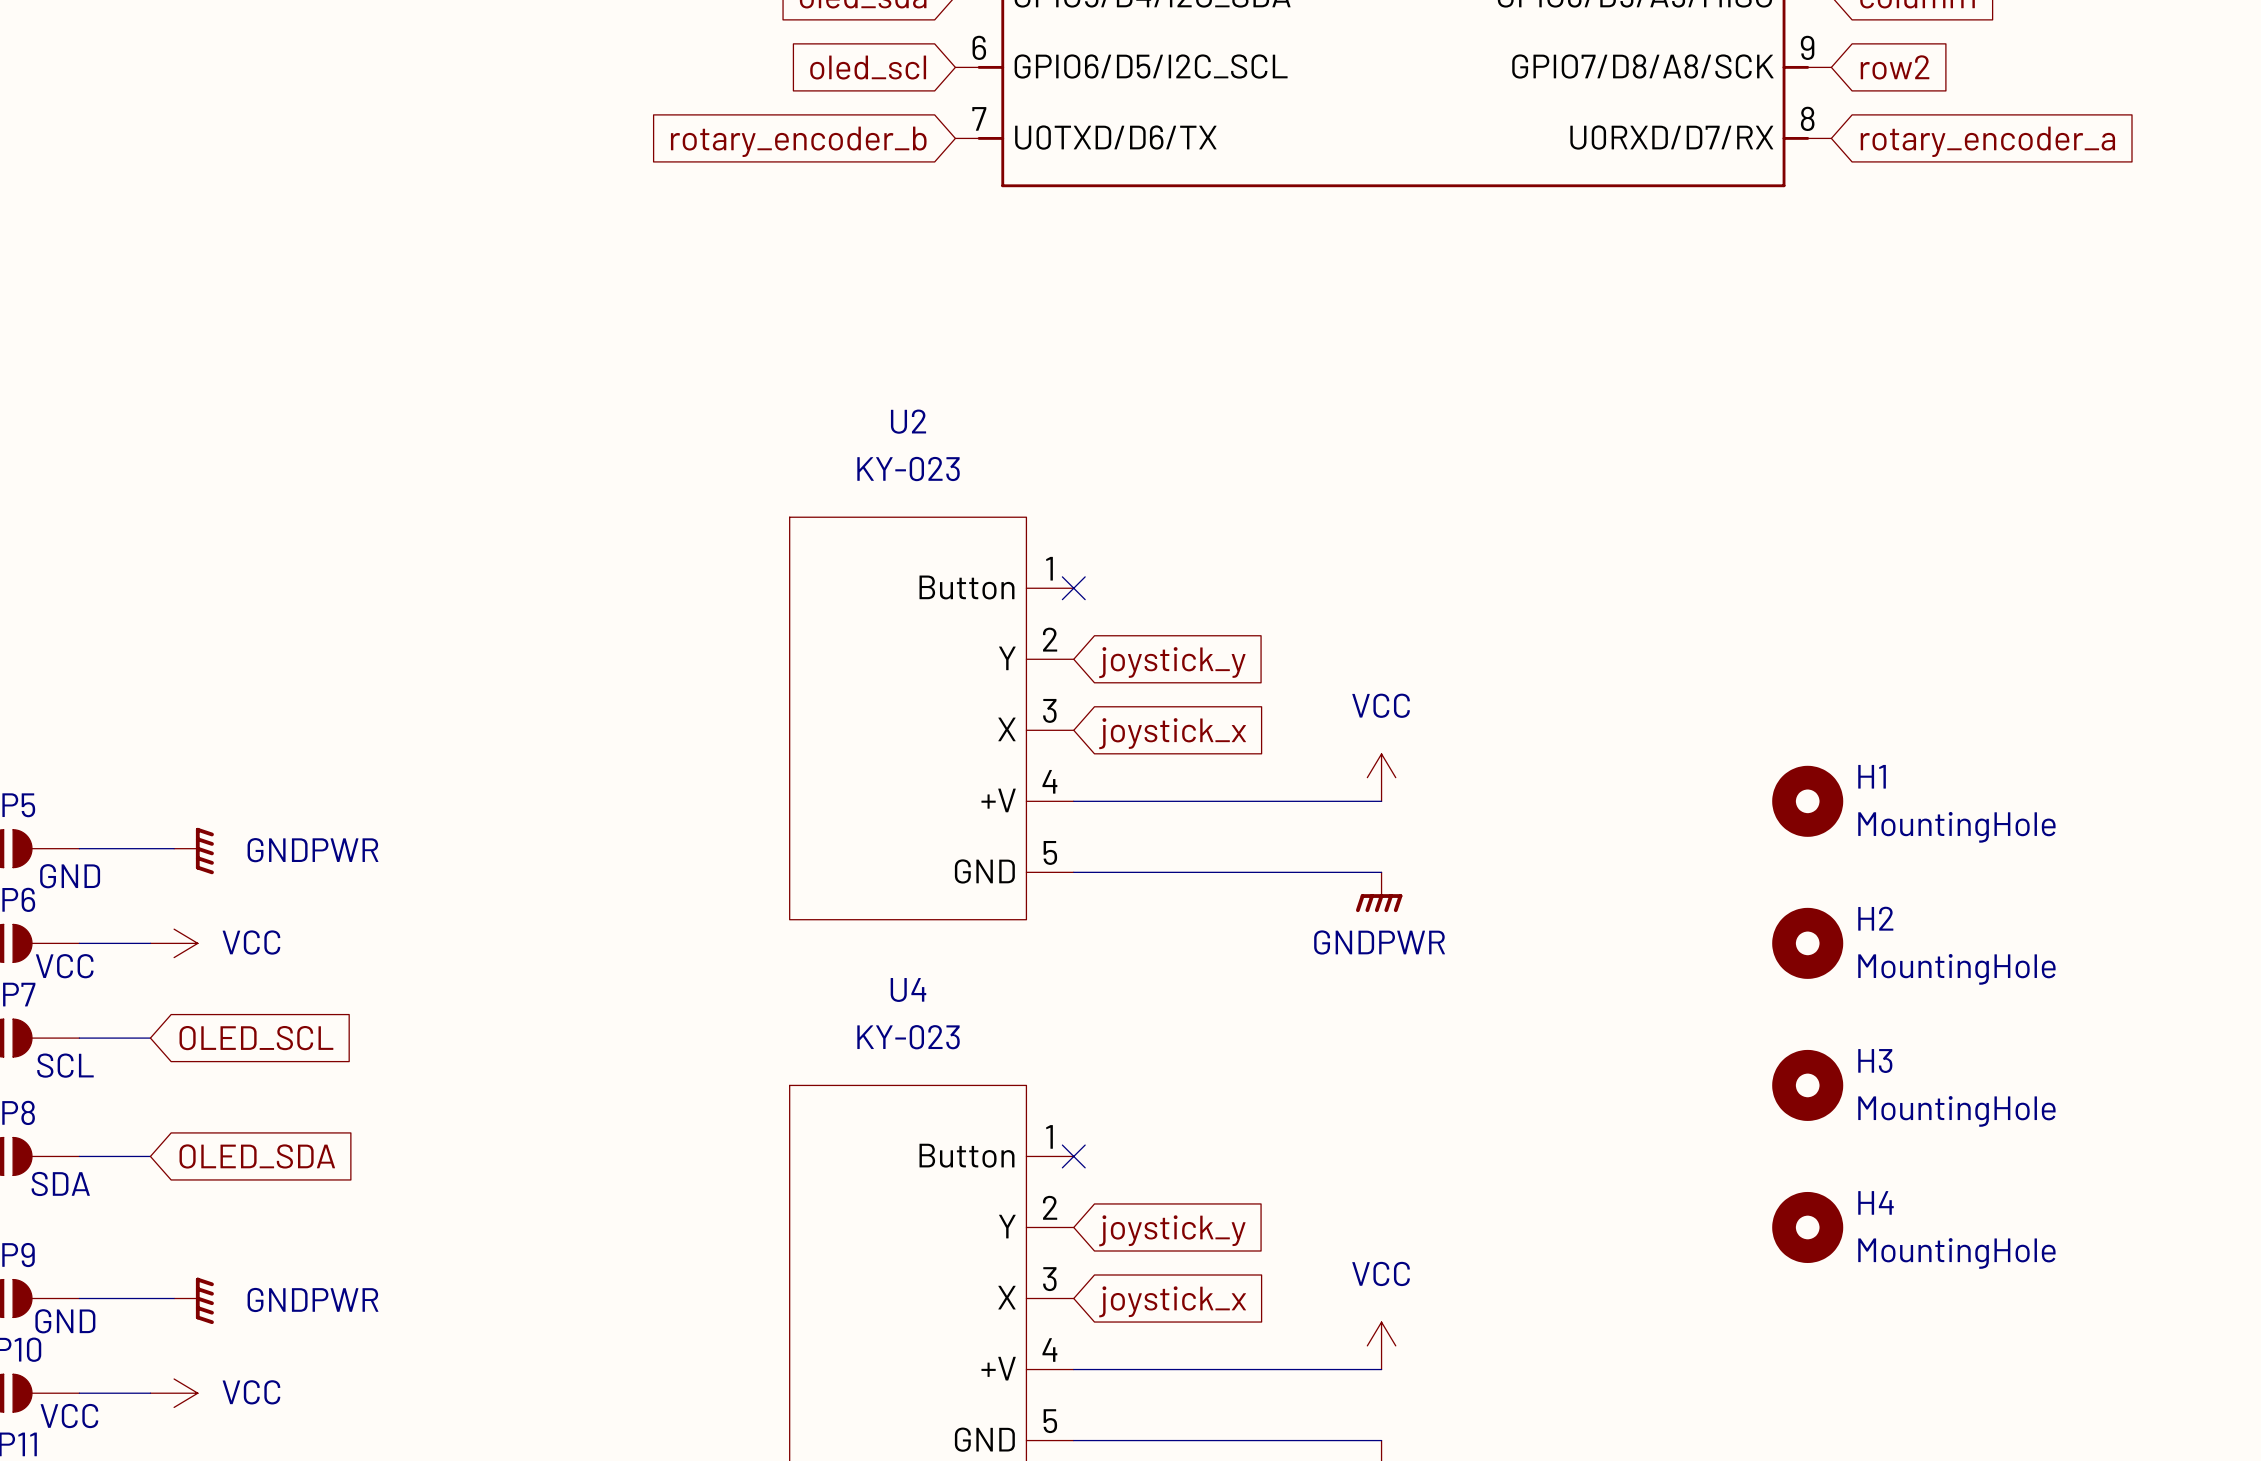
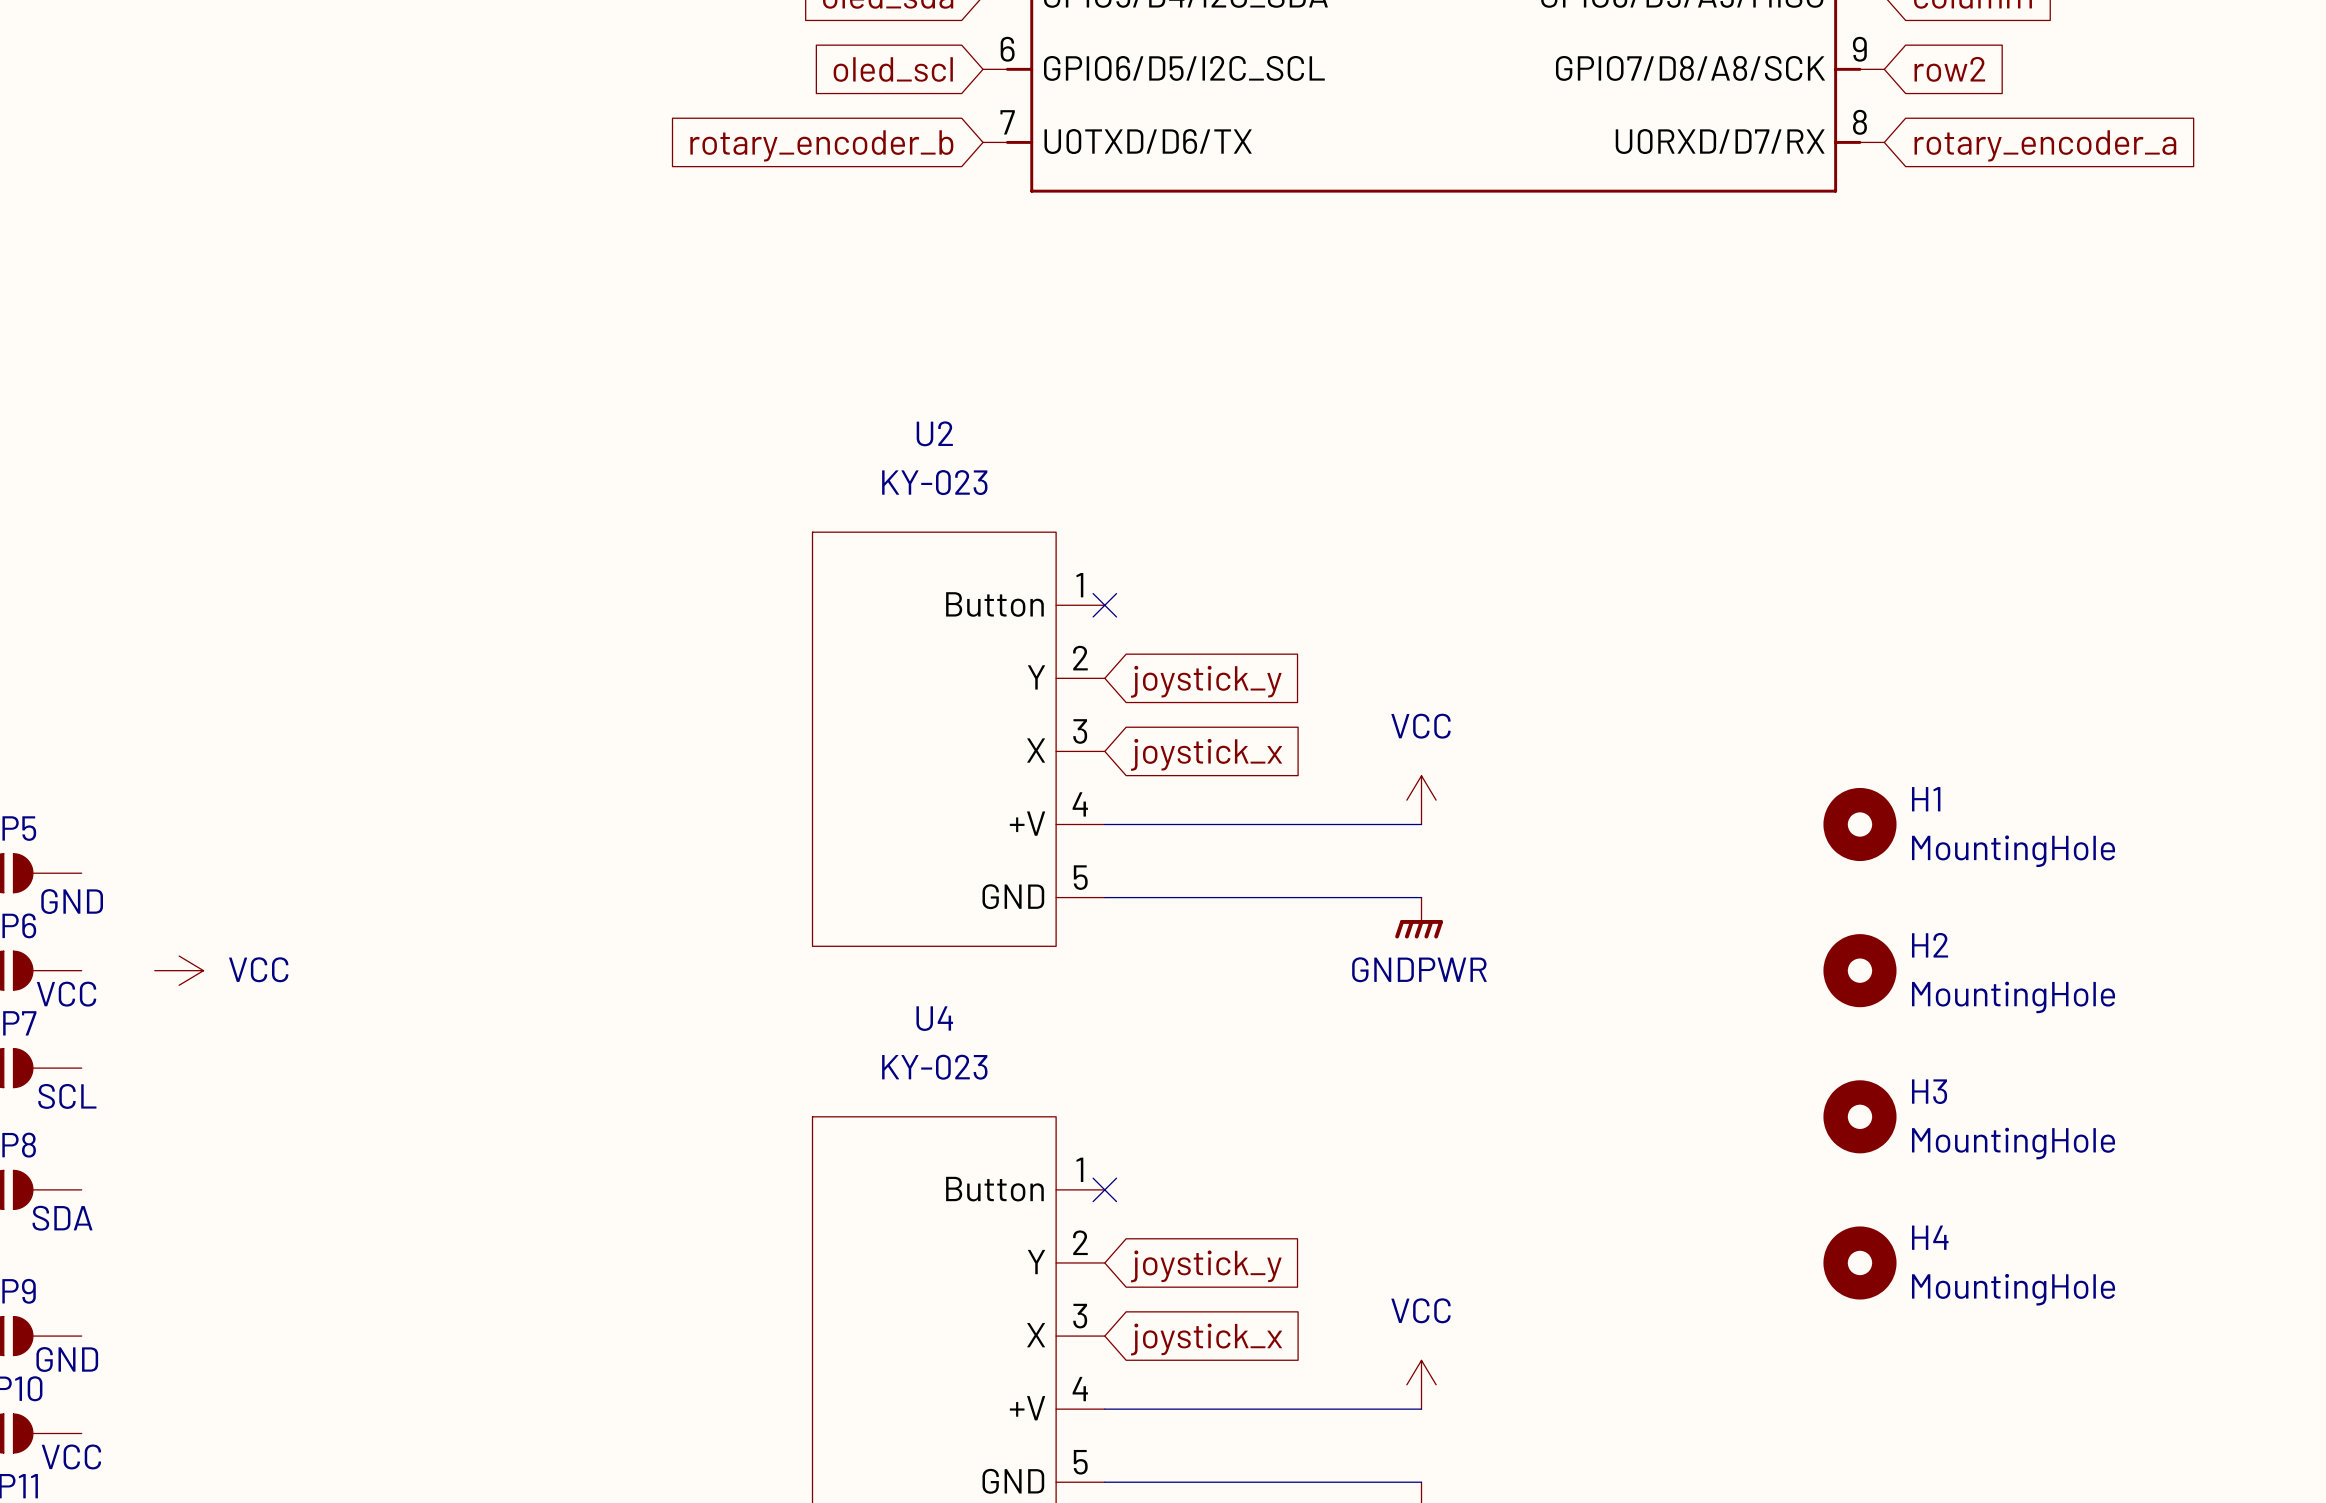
wire: (79, 848) (174, 848) -> none
power symbol: GNDPWR (194, 851) -> none
wire: (79, 943) (150, 943) -> none
wire: (79, 1038) (150, 1038) -> none
global label: OLED_SCL (256, 1038) -> none
wire: (79, 1156) (150, 1156) -> none
global label: OLED_SDA (257, 1156) -> none
wire: (79, 1298) (174, 1298) -> none
power symbol: GNDPWR (194, 1300) -> none
wire: (79, 1393) (150, 1393) -> none
power symbol: VCC (174, 1393) -> none

